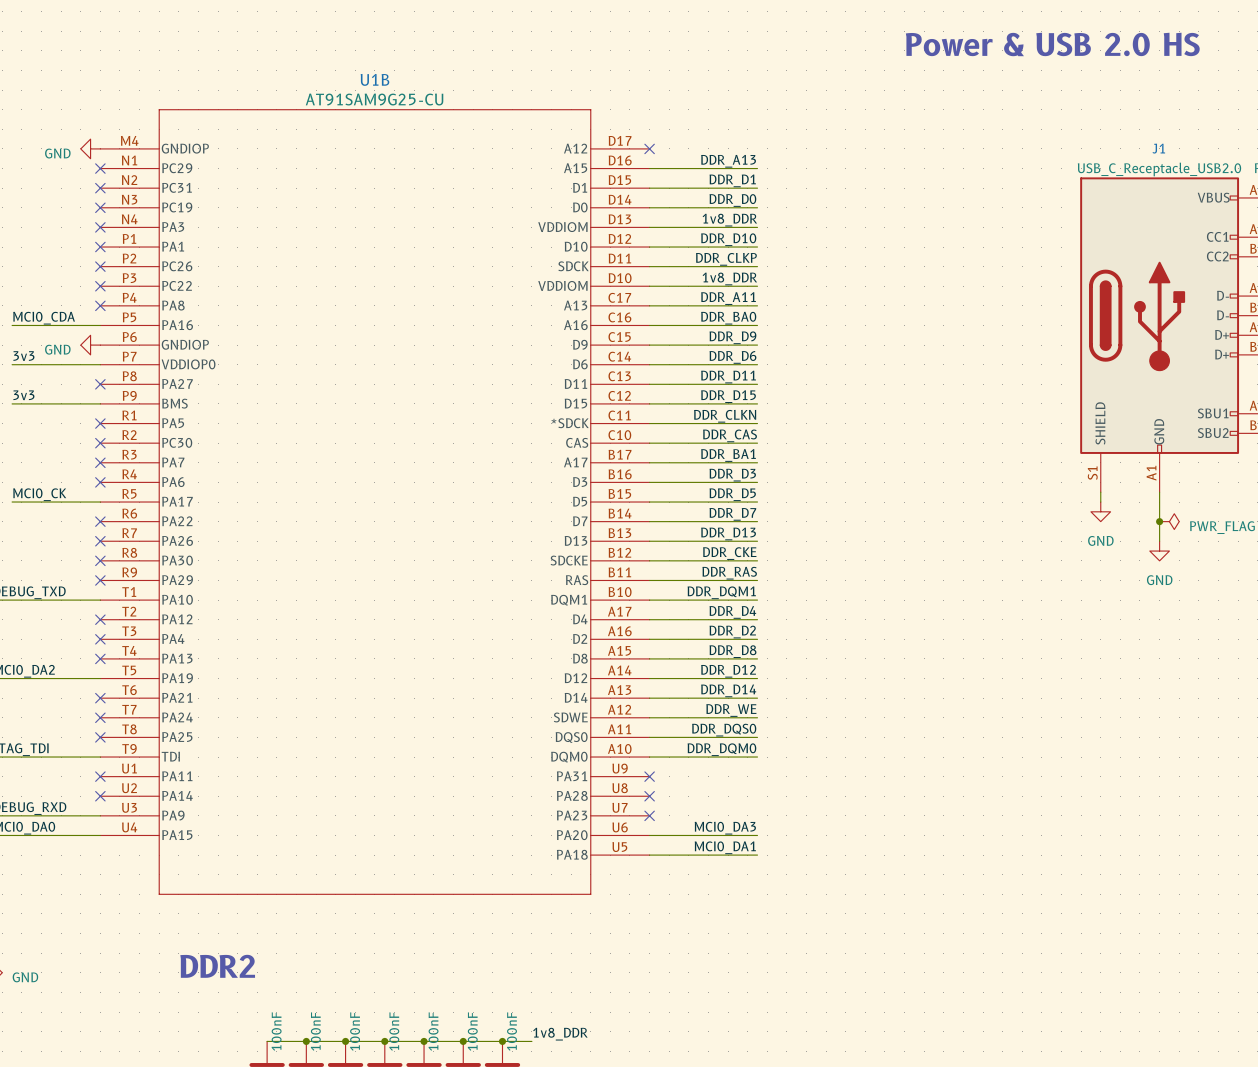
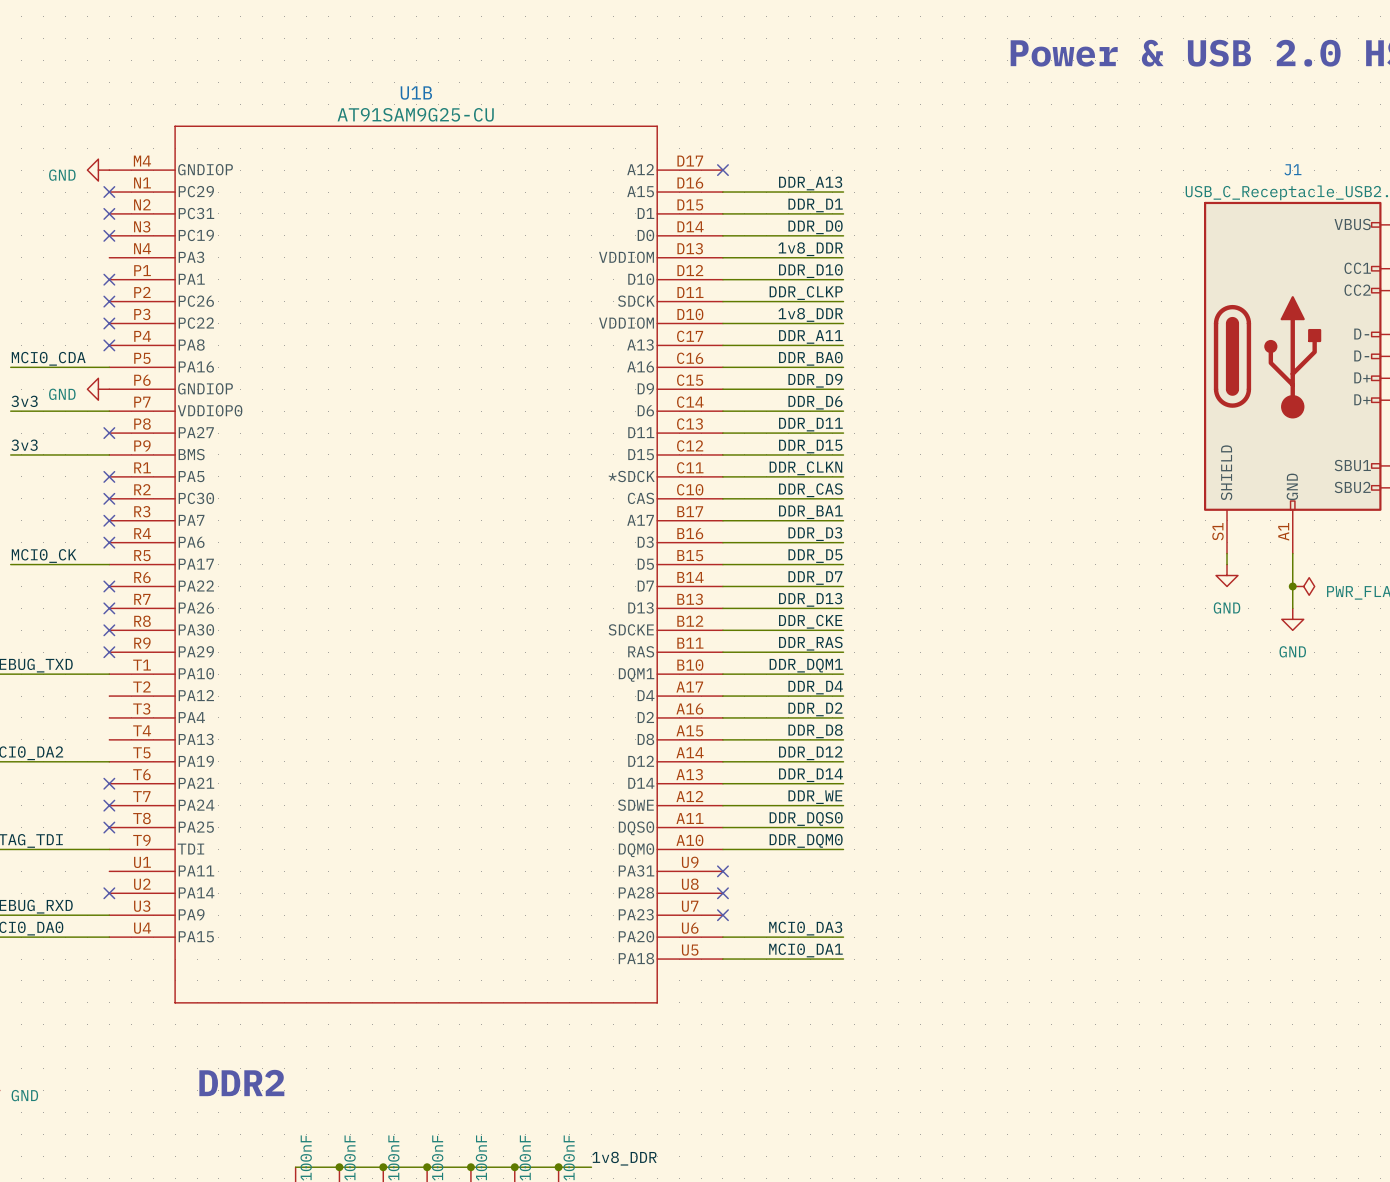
no-connect mark: (100, 227) -> none
no-connect mark: (100, 619) -> none
no-connect mark: (100, 639) -> none
no-connect mark: (100, 658) -> none
no-connect mark: (100, 776) -> none

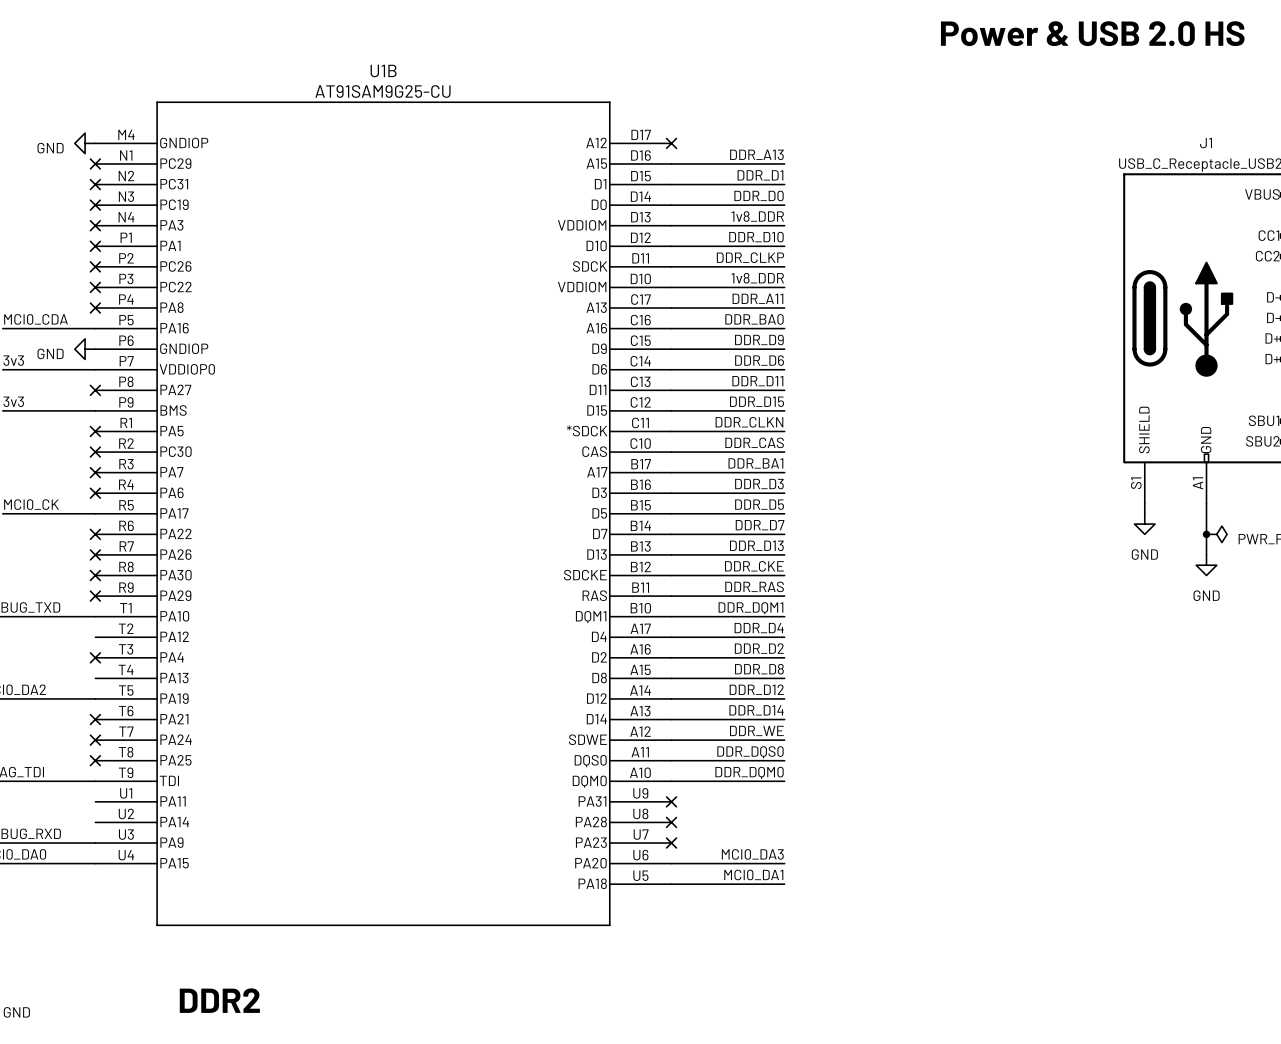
no-connect mark: none -> (95, 225)
no-connect mark: none -> (95, 657)
no-connect mark: (109, 893) -> none

